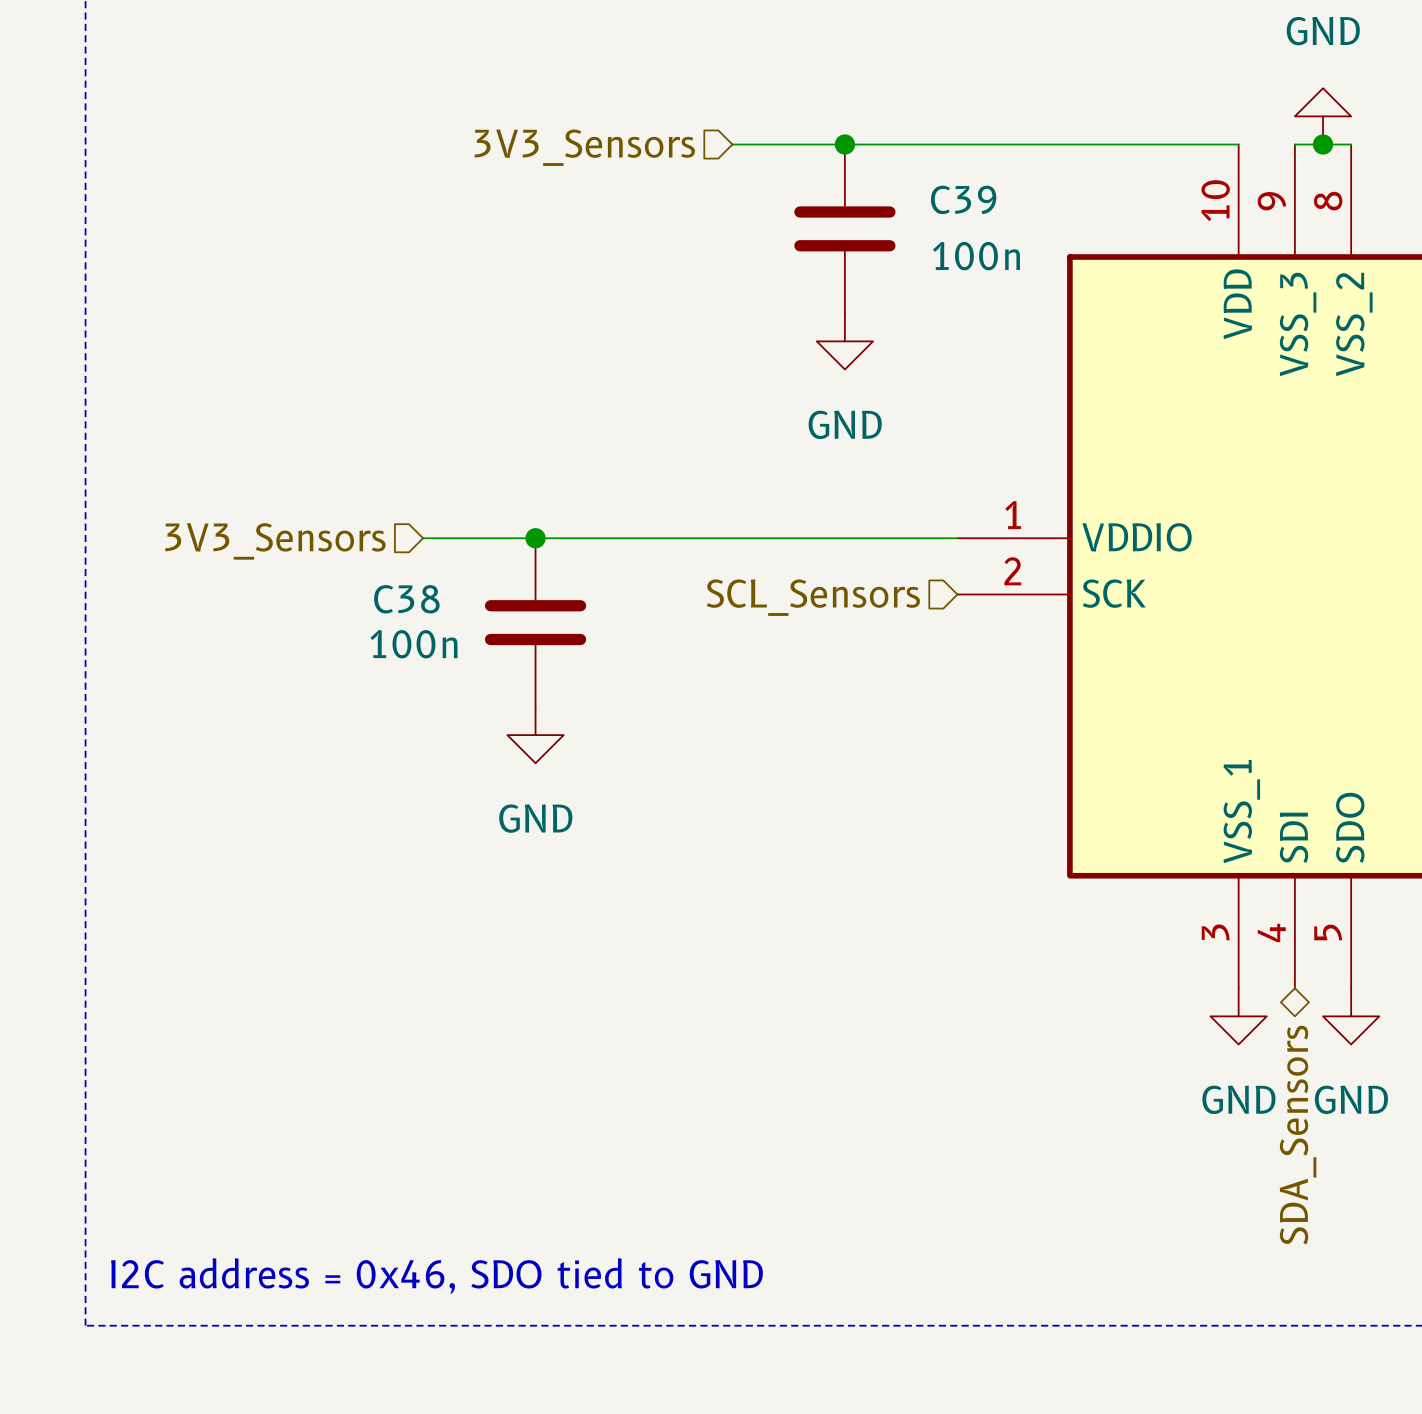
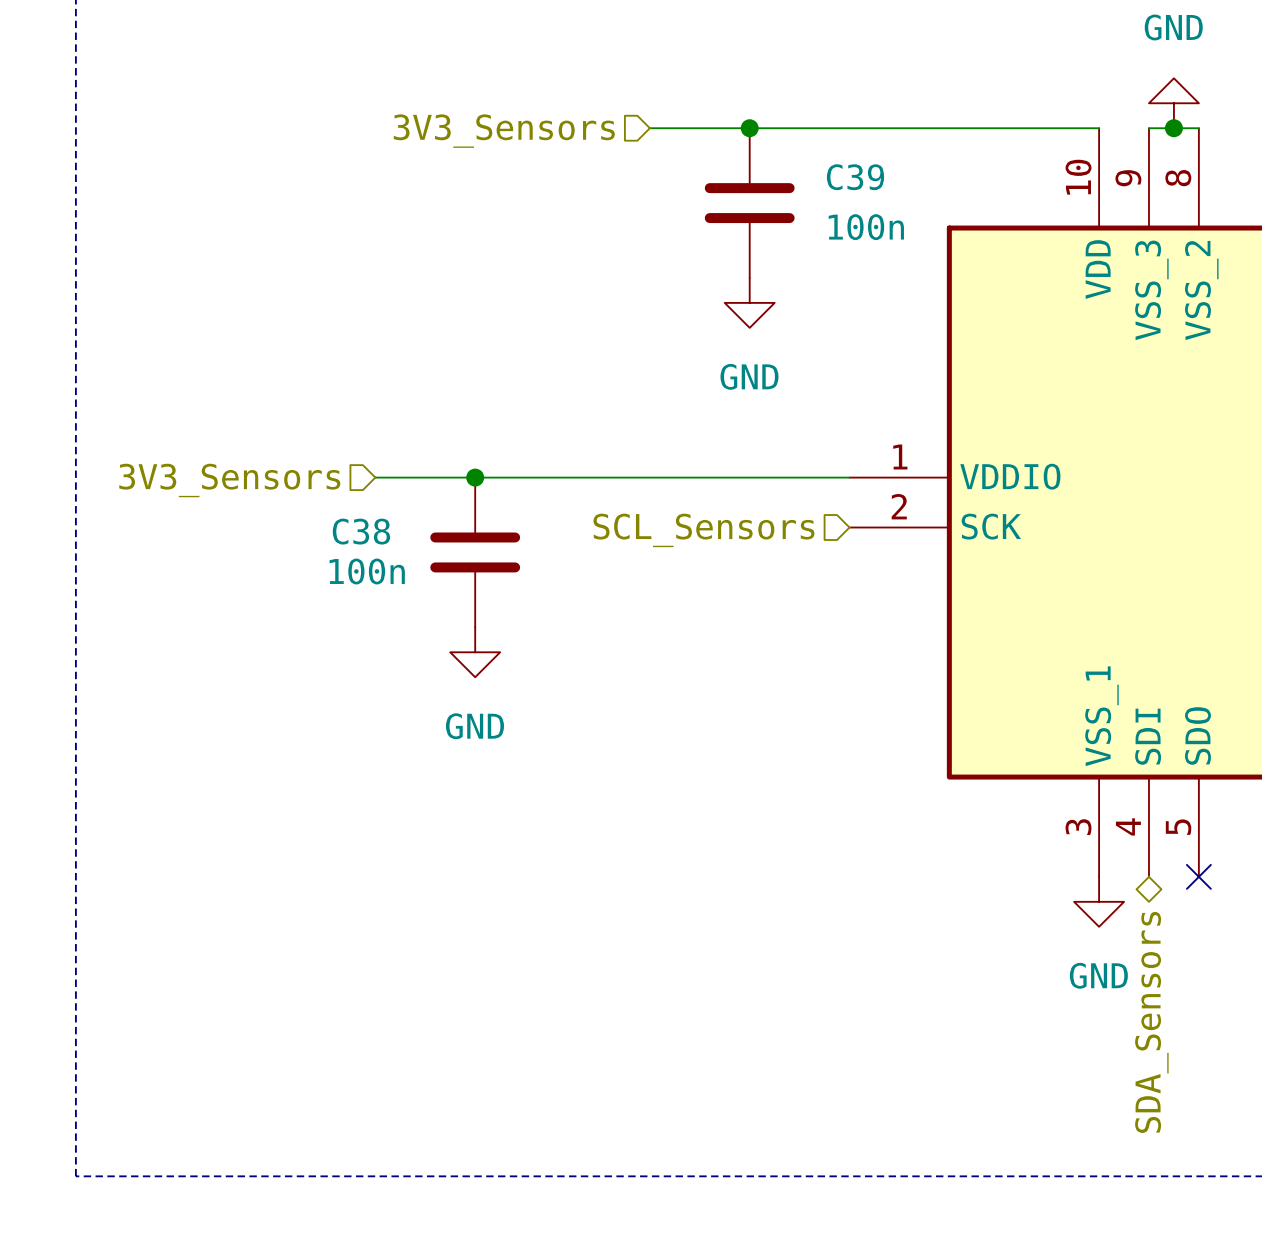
no-connect mark: none -> (1198, 876)
power symbol: GND (1351, 1016) -> none
text: I2C address = 0x46, SDO tied to GND (436, 1276) -> none

